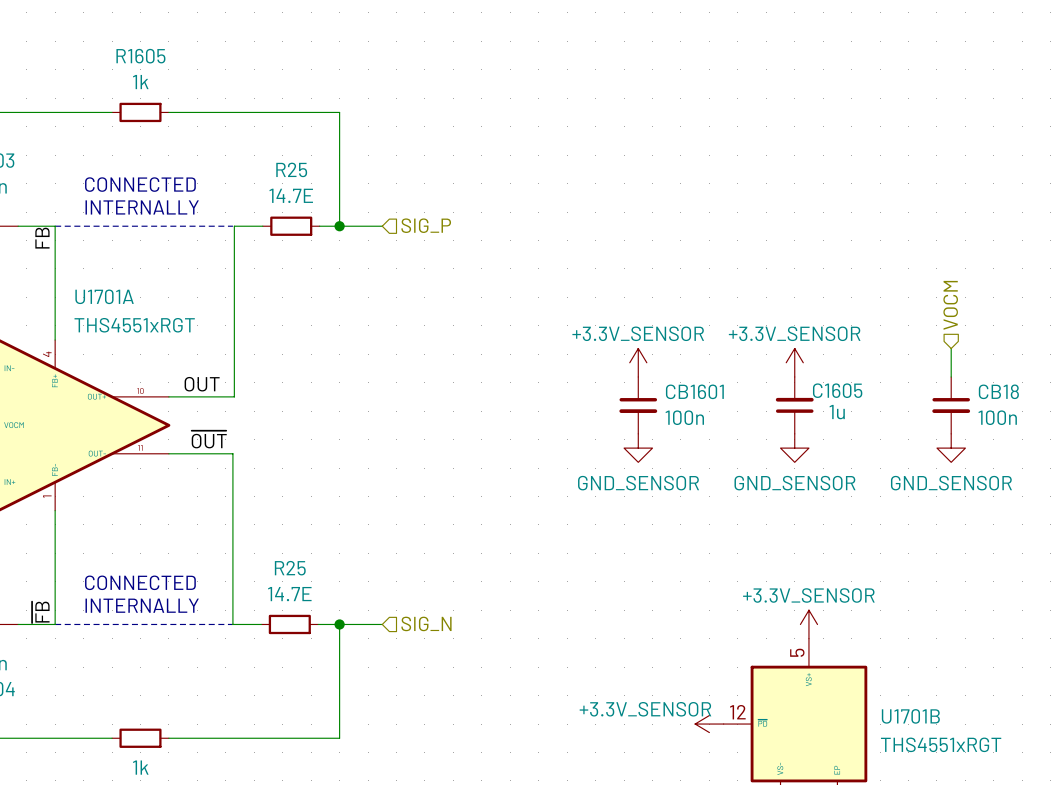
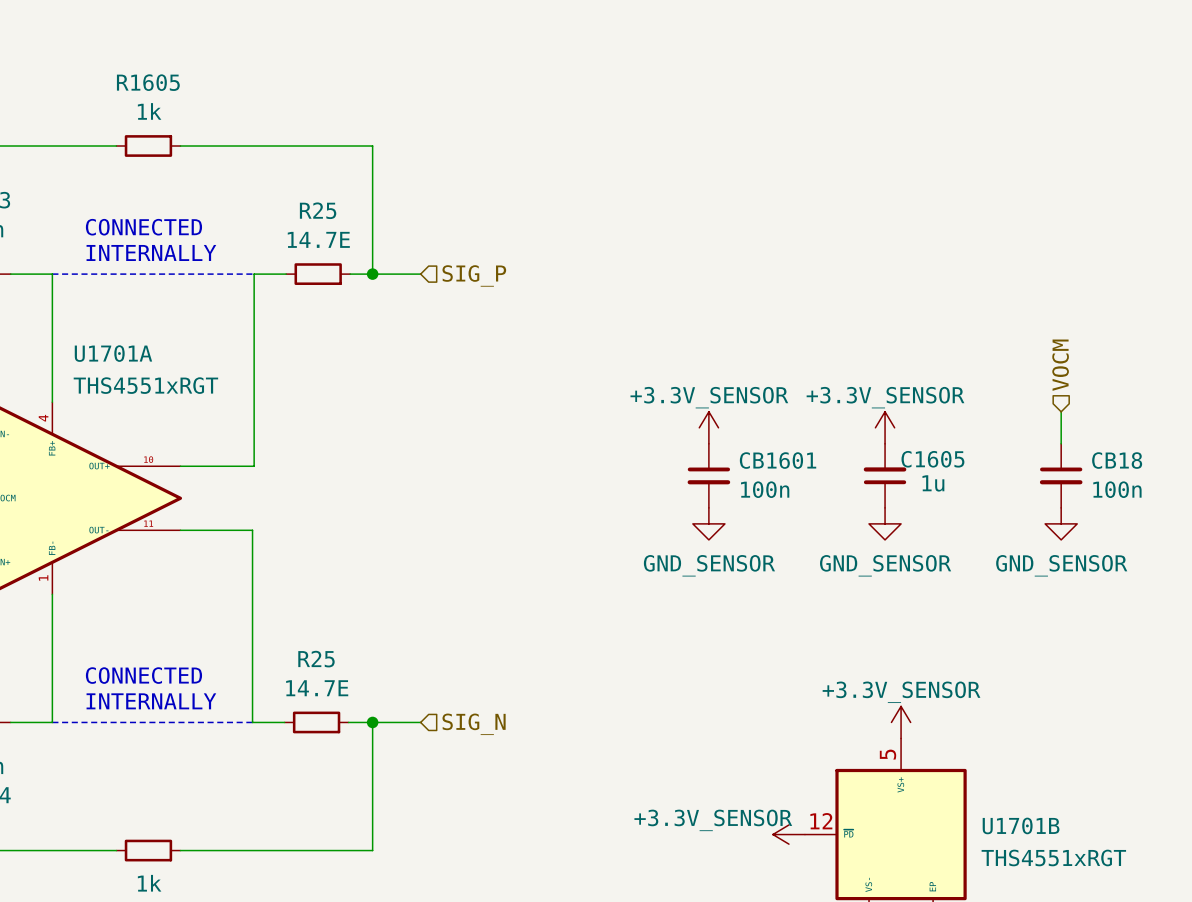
label: FB (42, 238) -> none
label: OUT (202, 384) -> none
label: ~{OUT} (209, 439) -> none
label: ~{FB} (40, 612) -> none

